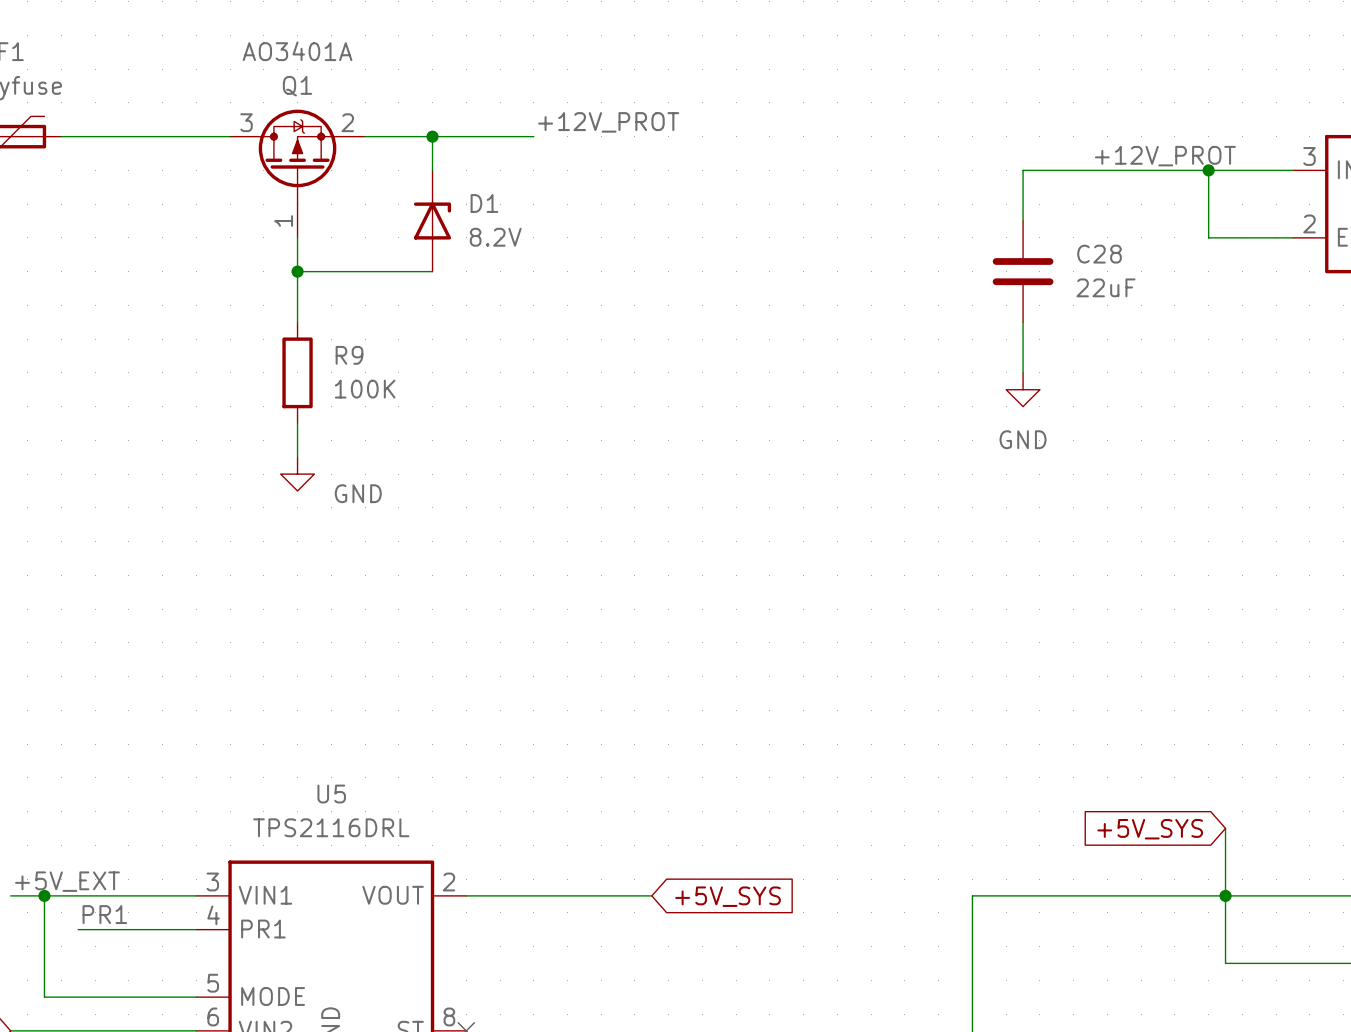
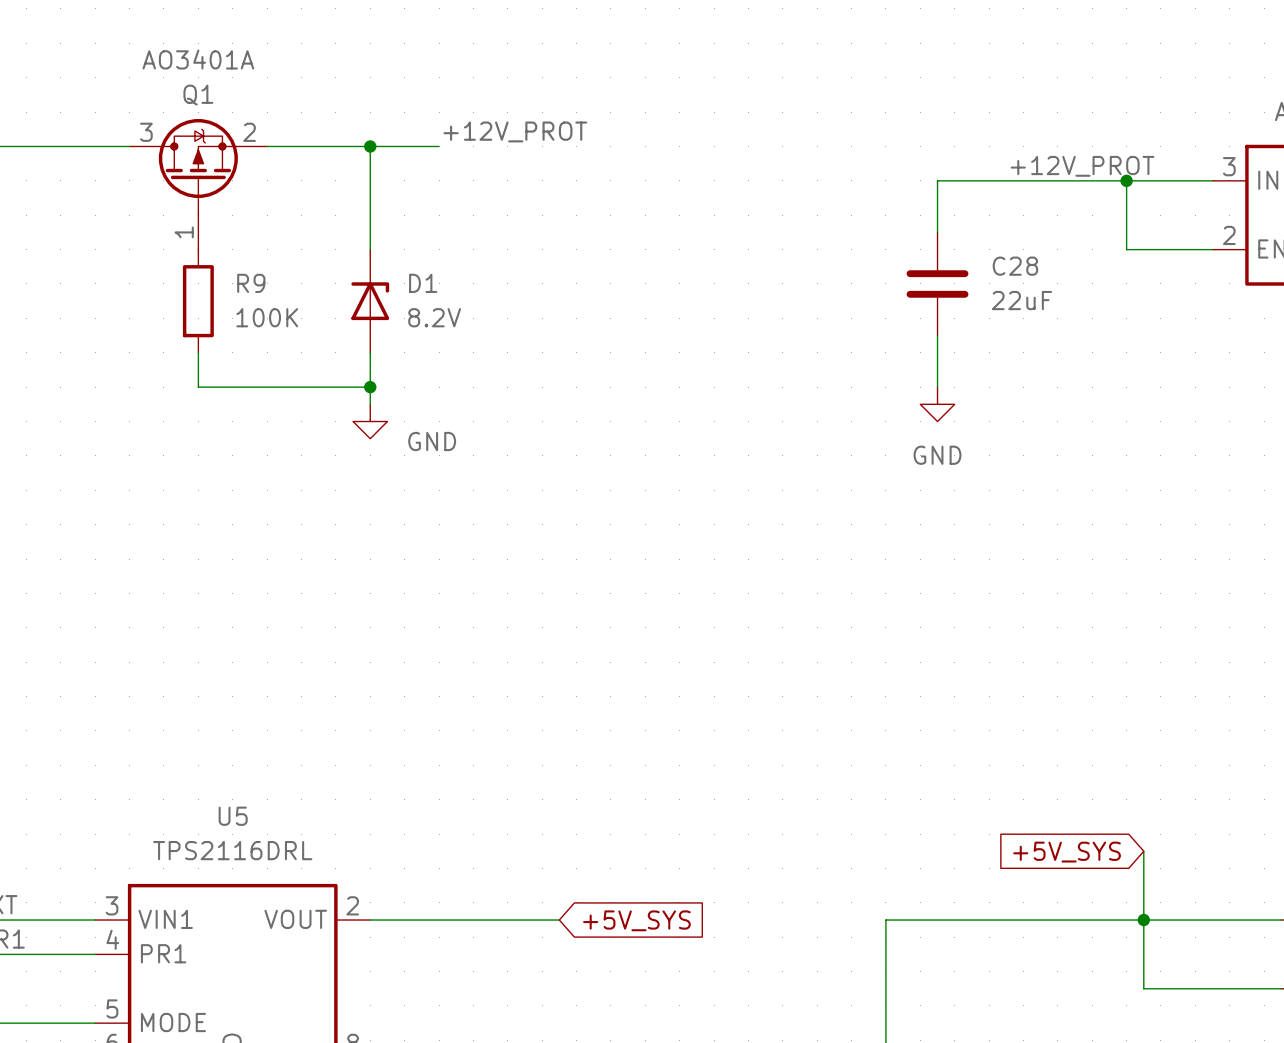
wire: (432, 136) (432, 170) -> none
junction position: (432, 136) -> (370, 146)
wire: none -> (370, 146) (370, 249)
D1 position: (432, 221) -> (370, 301)
wire: (297, 237) (297, 322) -> none
wire: (297, 271) (432, 271) -> none
junction: (297, 271) -> none
wire: none -> (198, 352) (198, 387) (370, 387)
wire: none -> (370, 352) (370, 404)
R9 position: (297, 372) -> (198, 301)
junction: none -> (370, 387)
wire: (297, 423) (297, 457) -> none
power symbol position: GND (297, 474) -> GND (370, 421)

